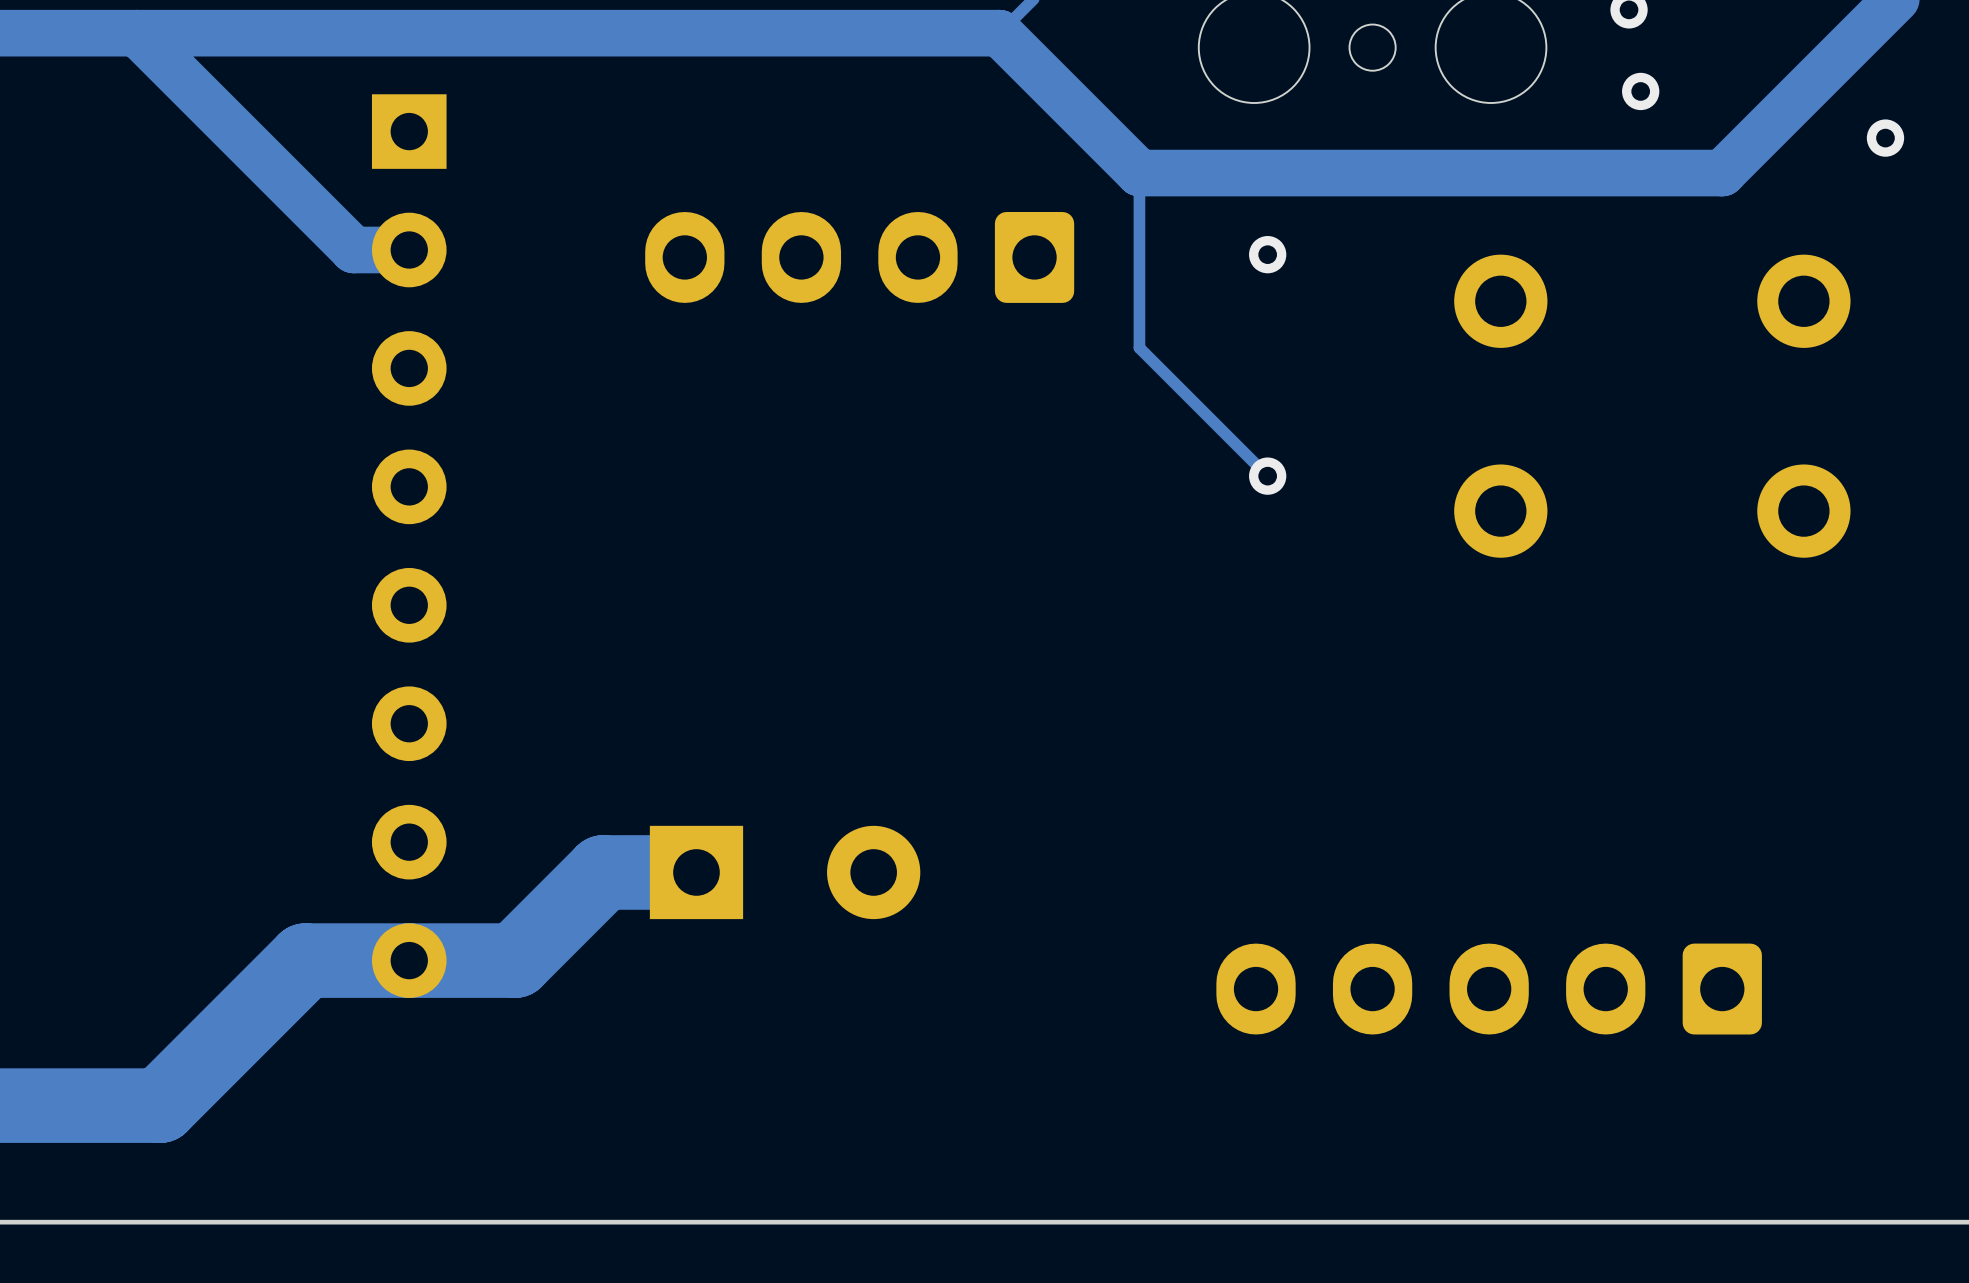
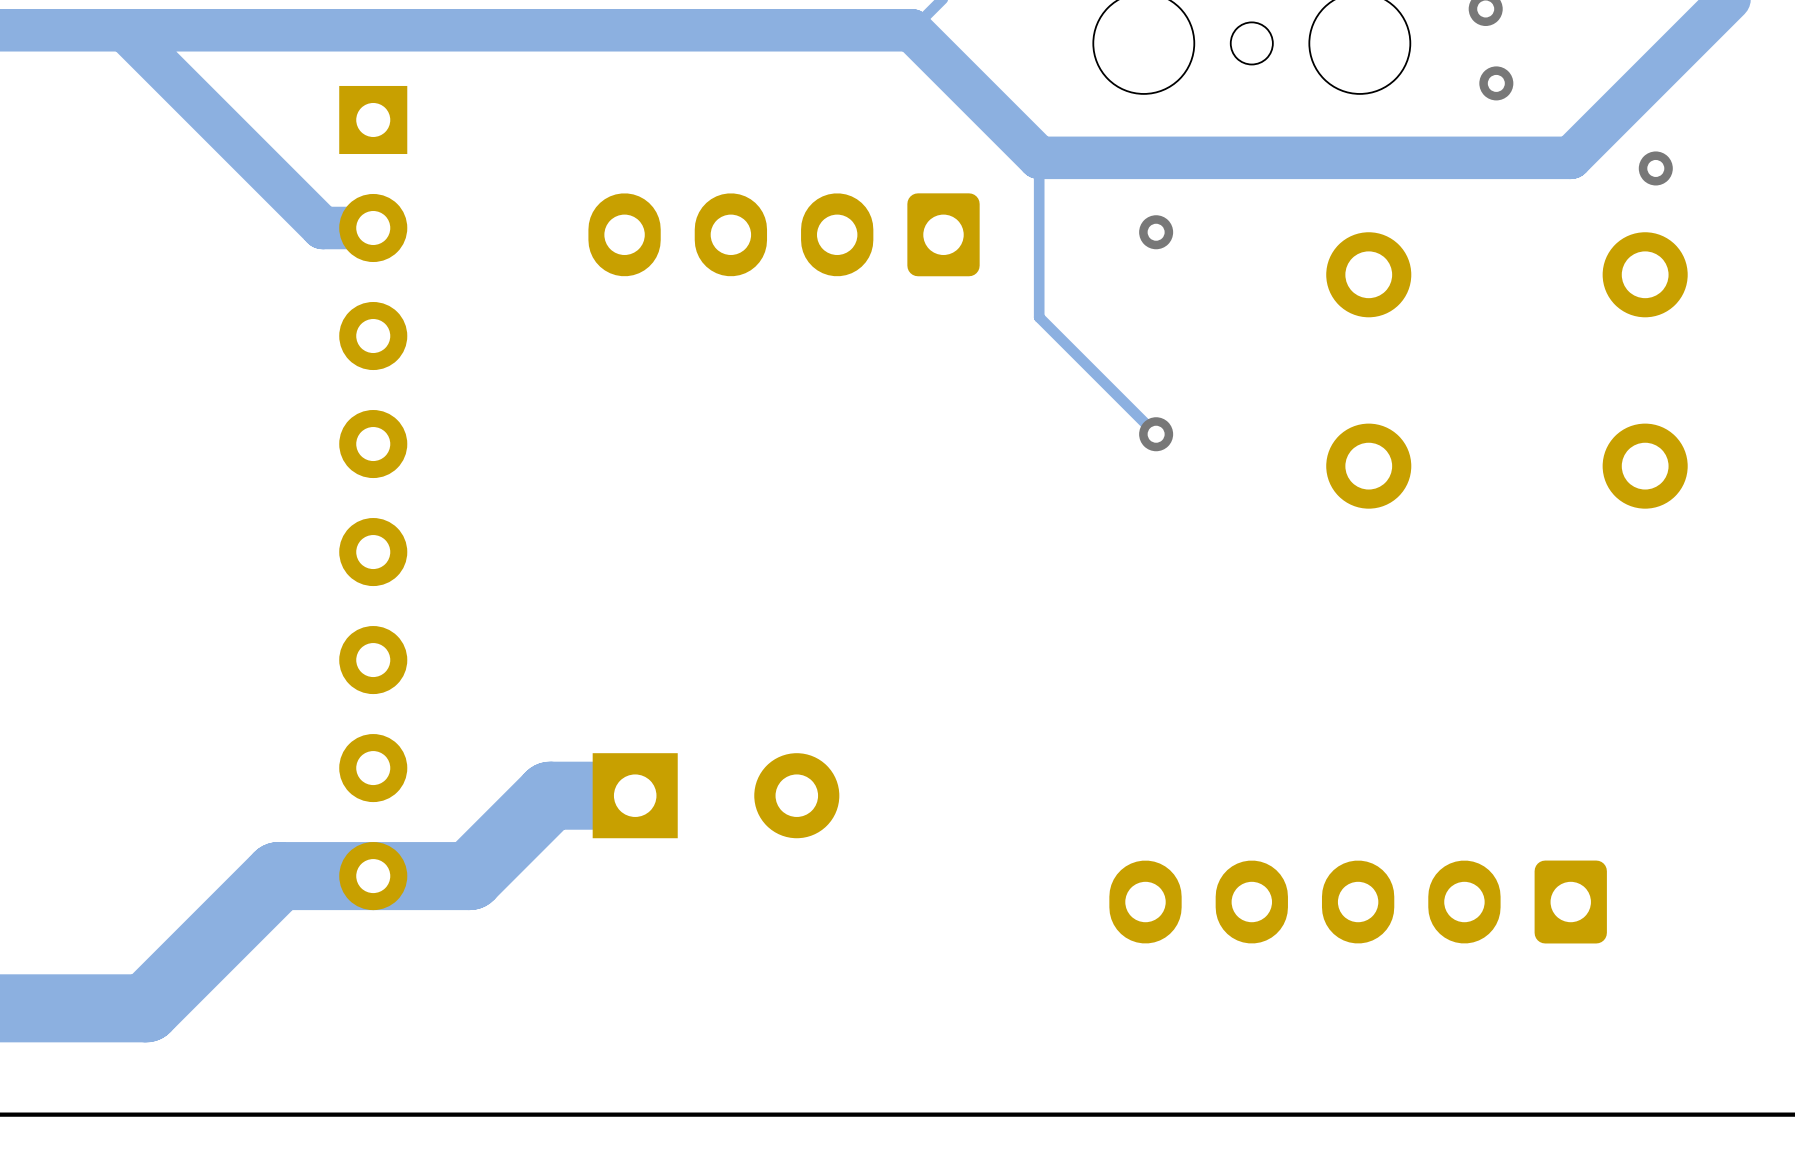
via position: (1885, 138) -> (1655, 168)

